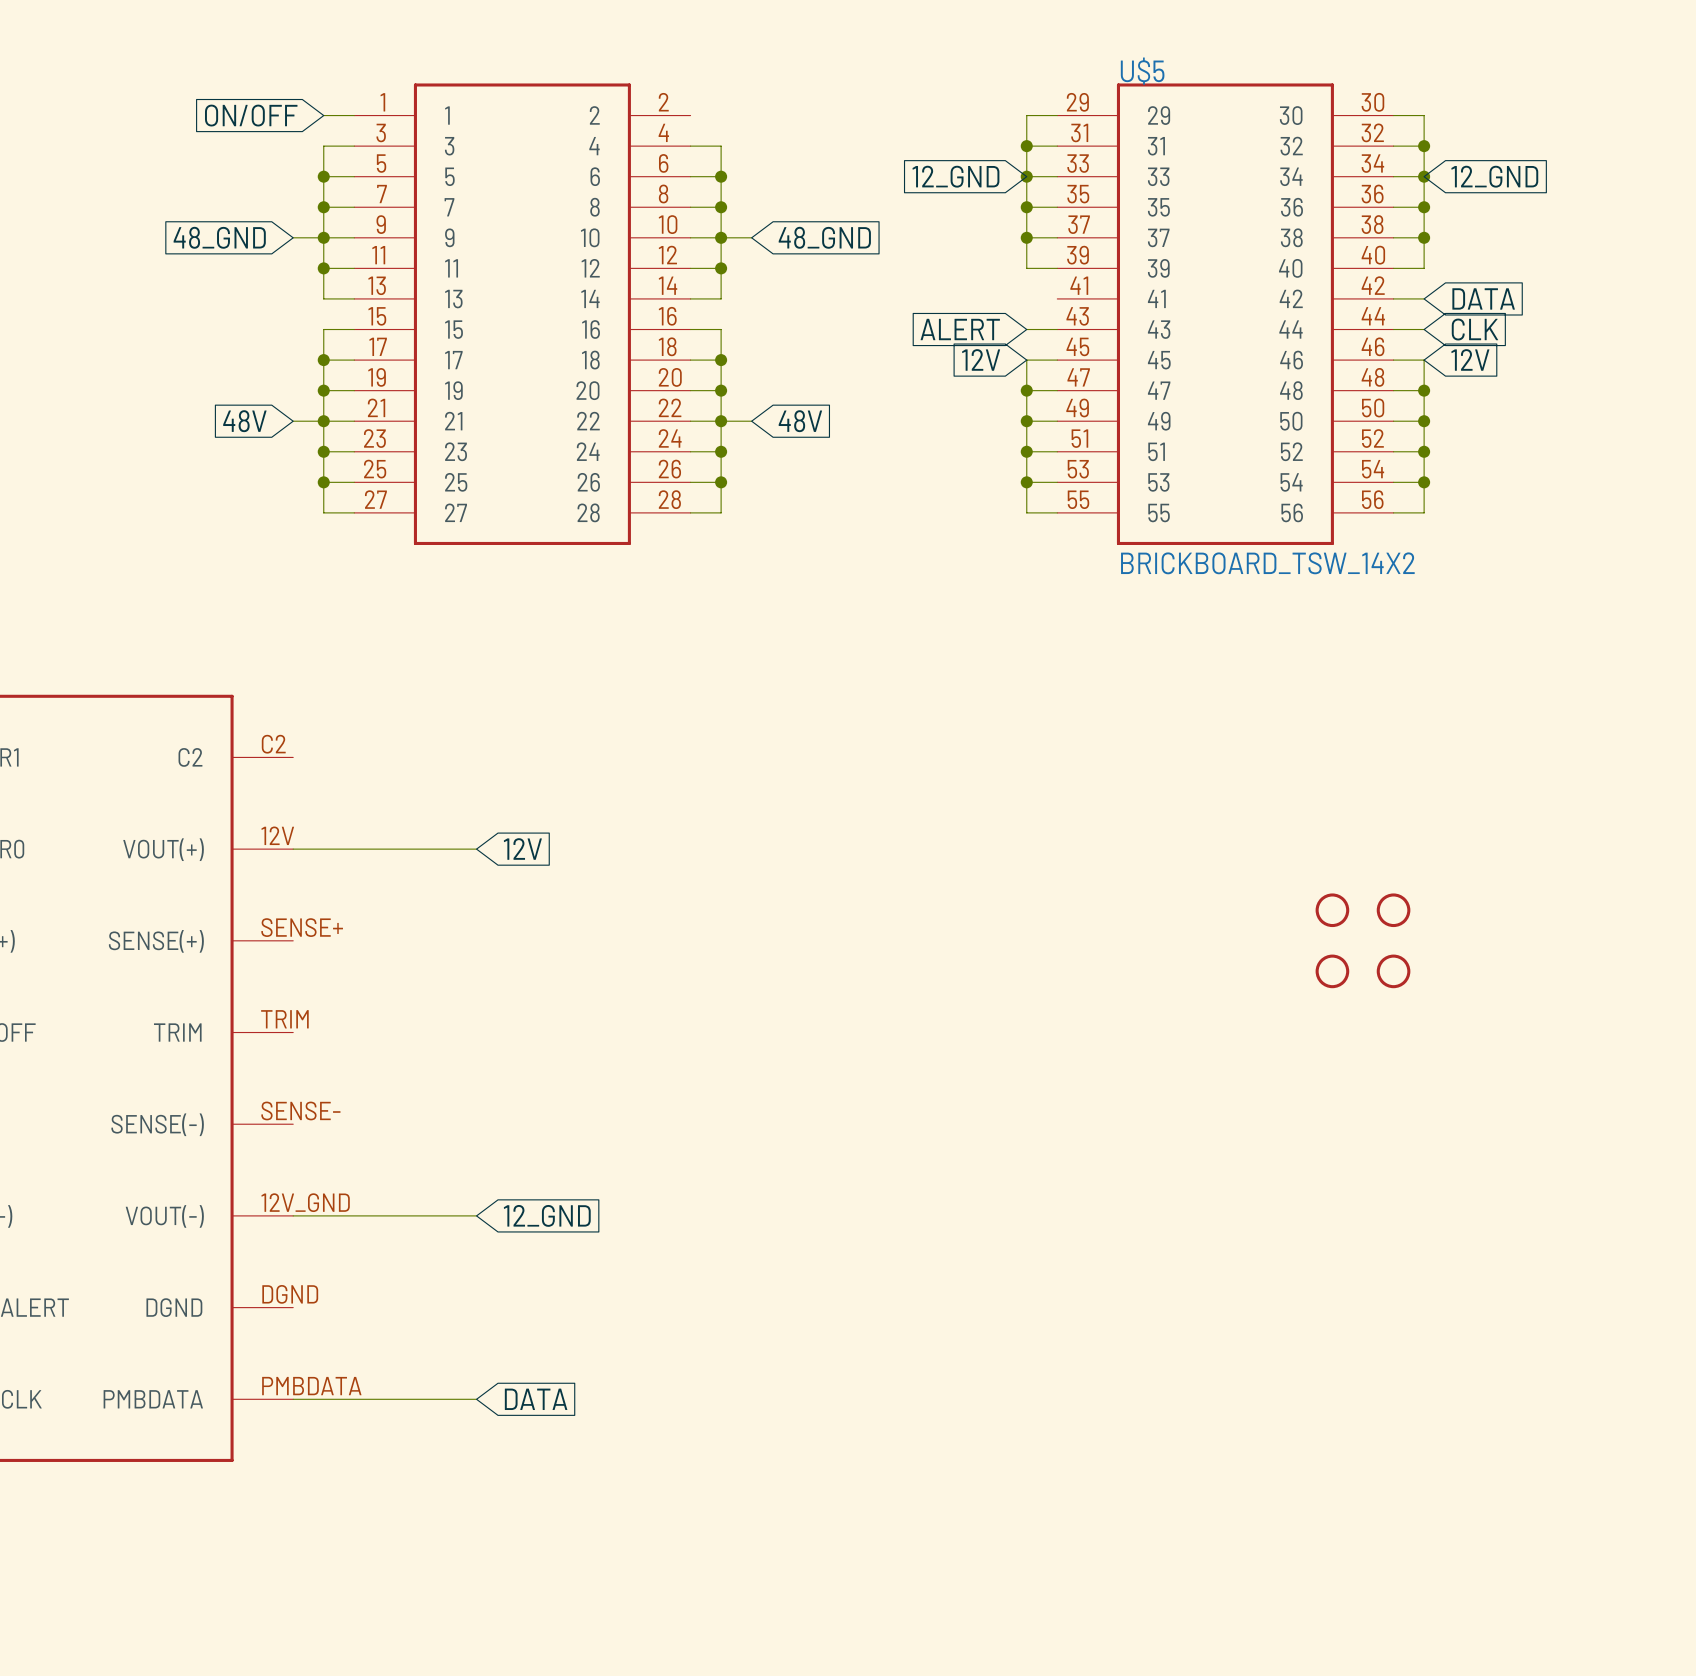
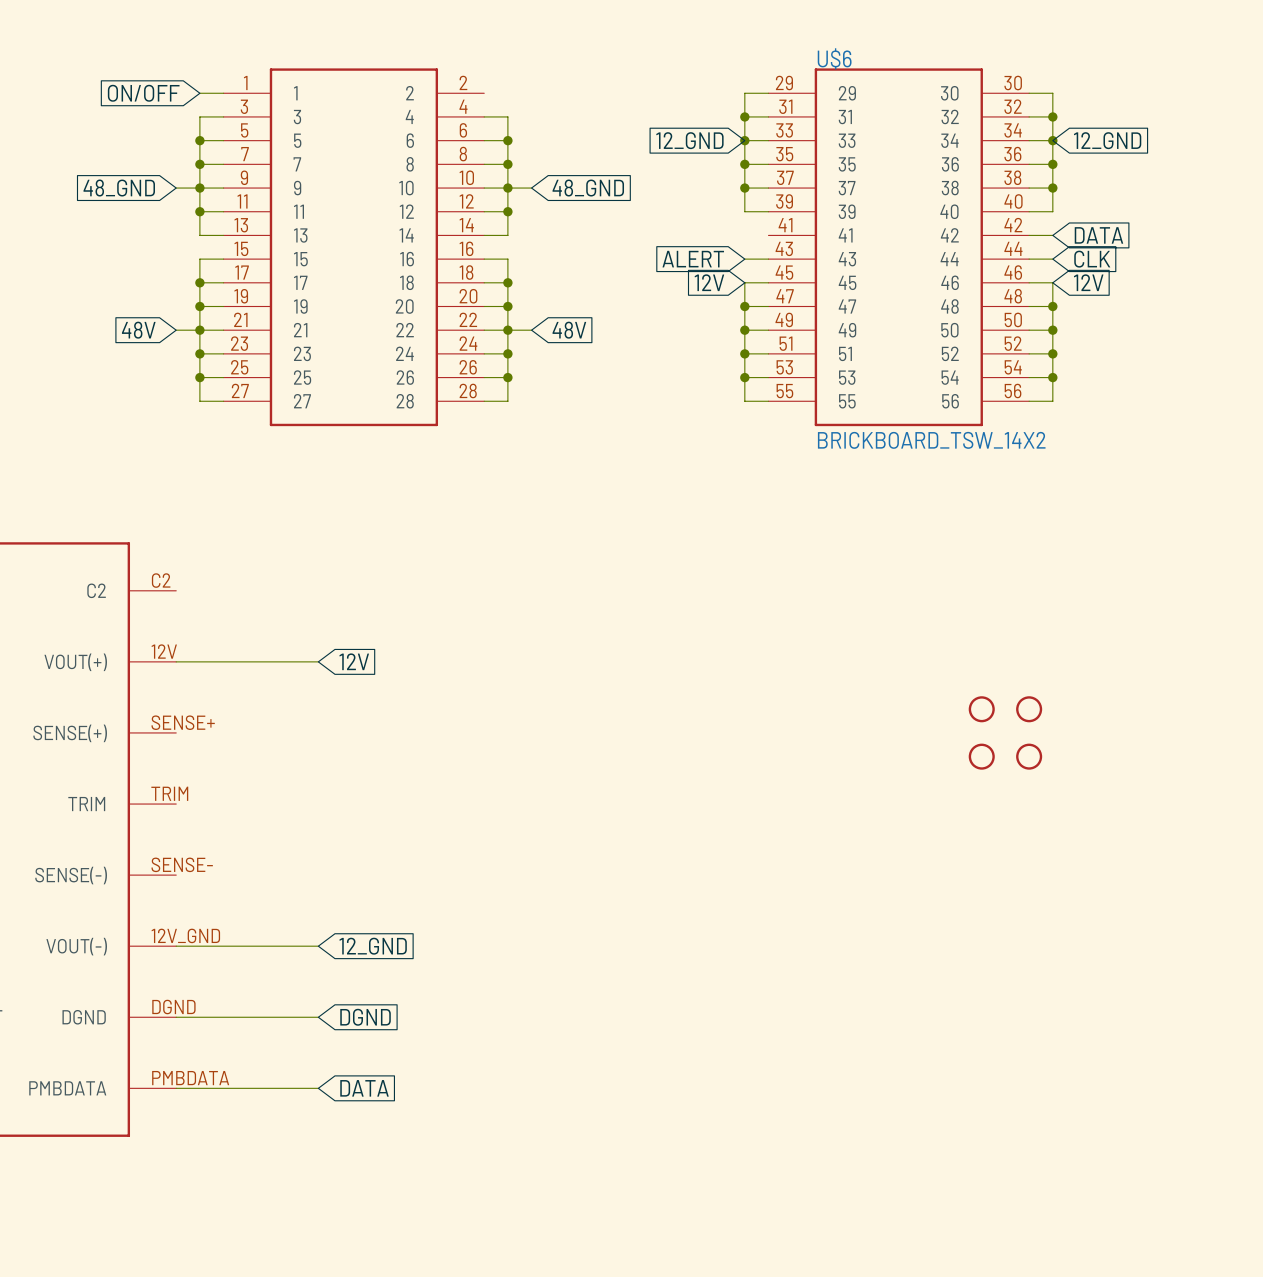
U$5 name: U$5 (1142, 71) -> U$6 (834, 58)
wire: none -> (176, 1017) (318, 1017)
global label: none -> DGND (365, 1017)

